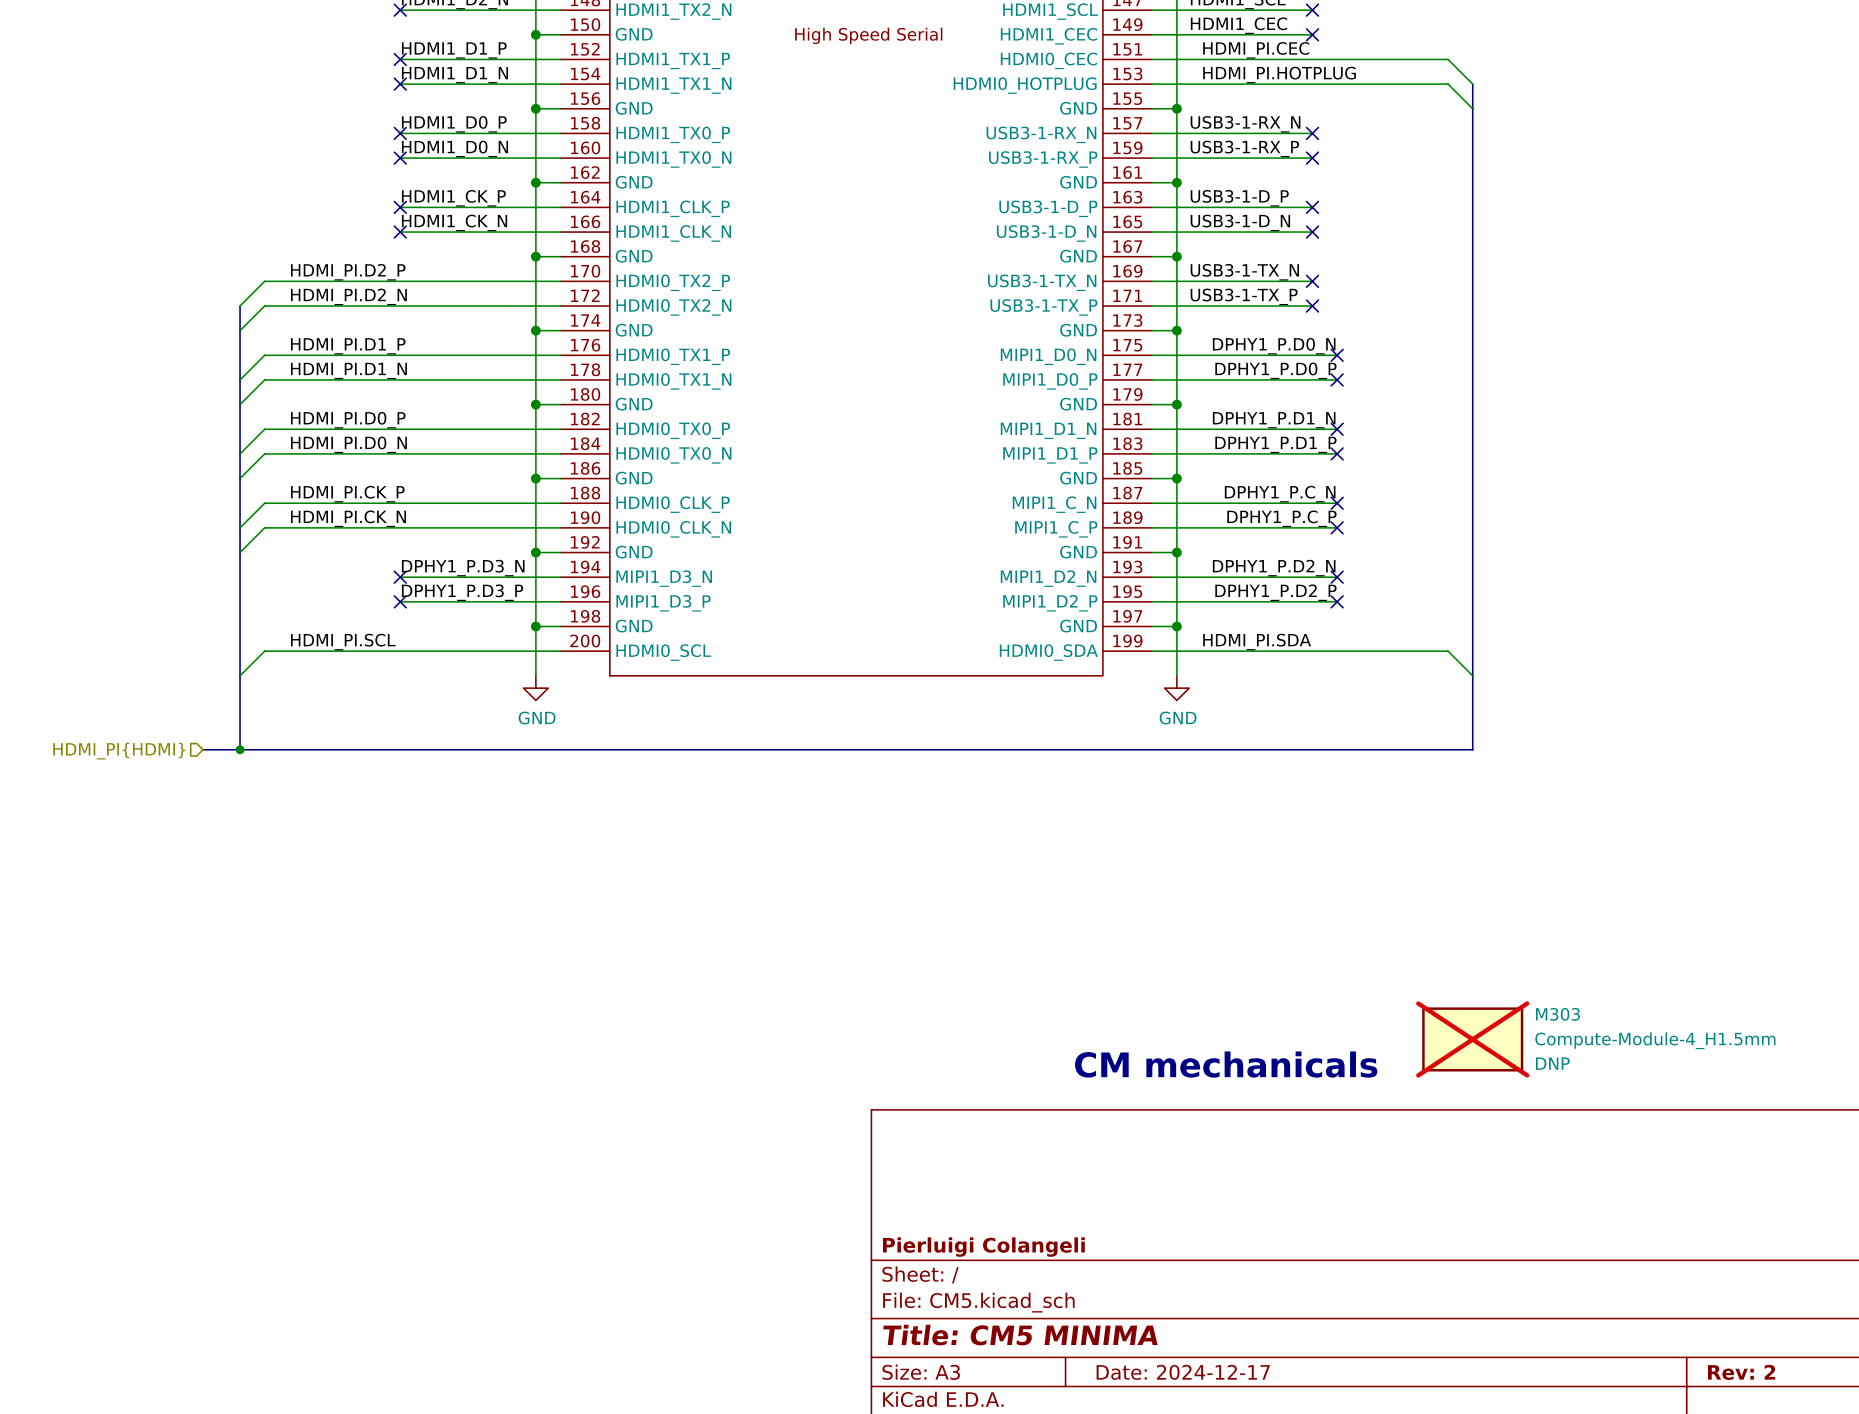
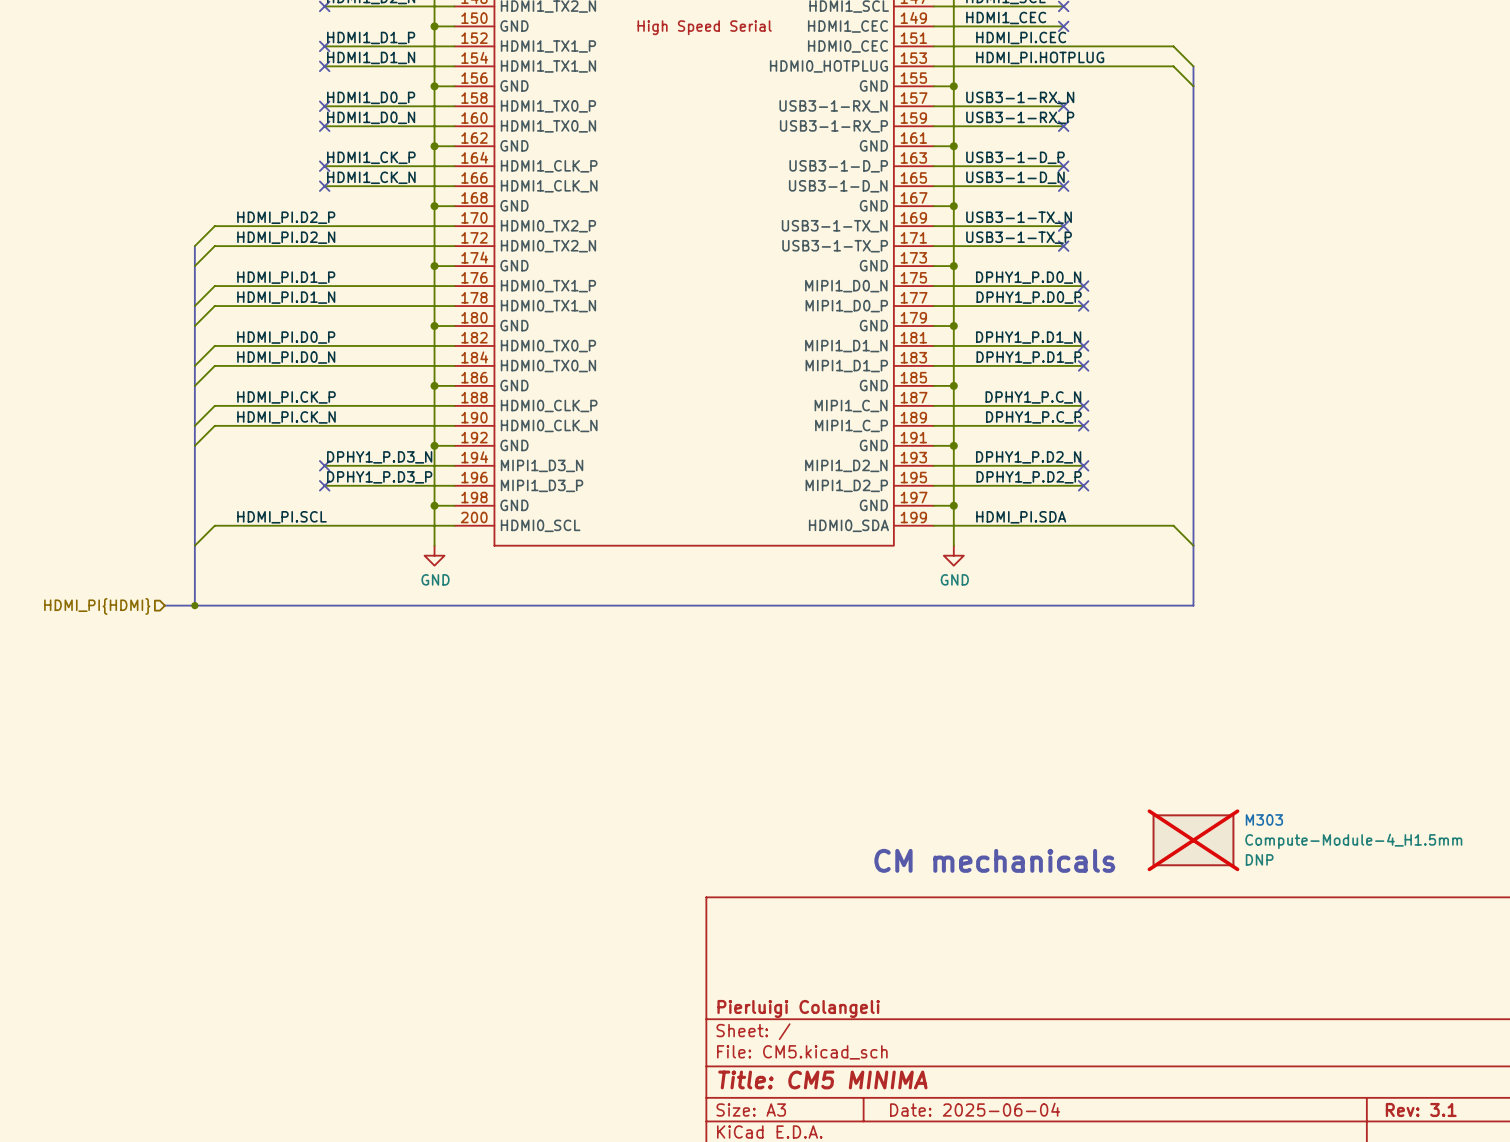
title block: Date: 2024-12-17 (1183, 1372) -> Date: 2025-06-04 (975, 1109)
title block: Rev: 2 (1741, 1372) -> Rev: 3.1 (1421, 1109)

